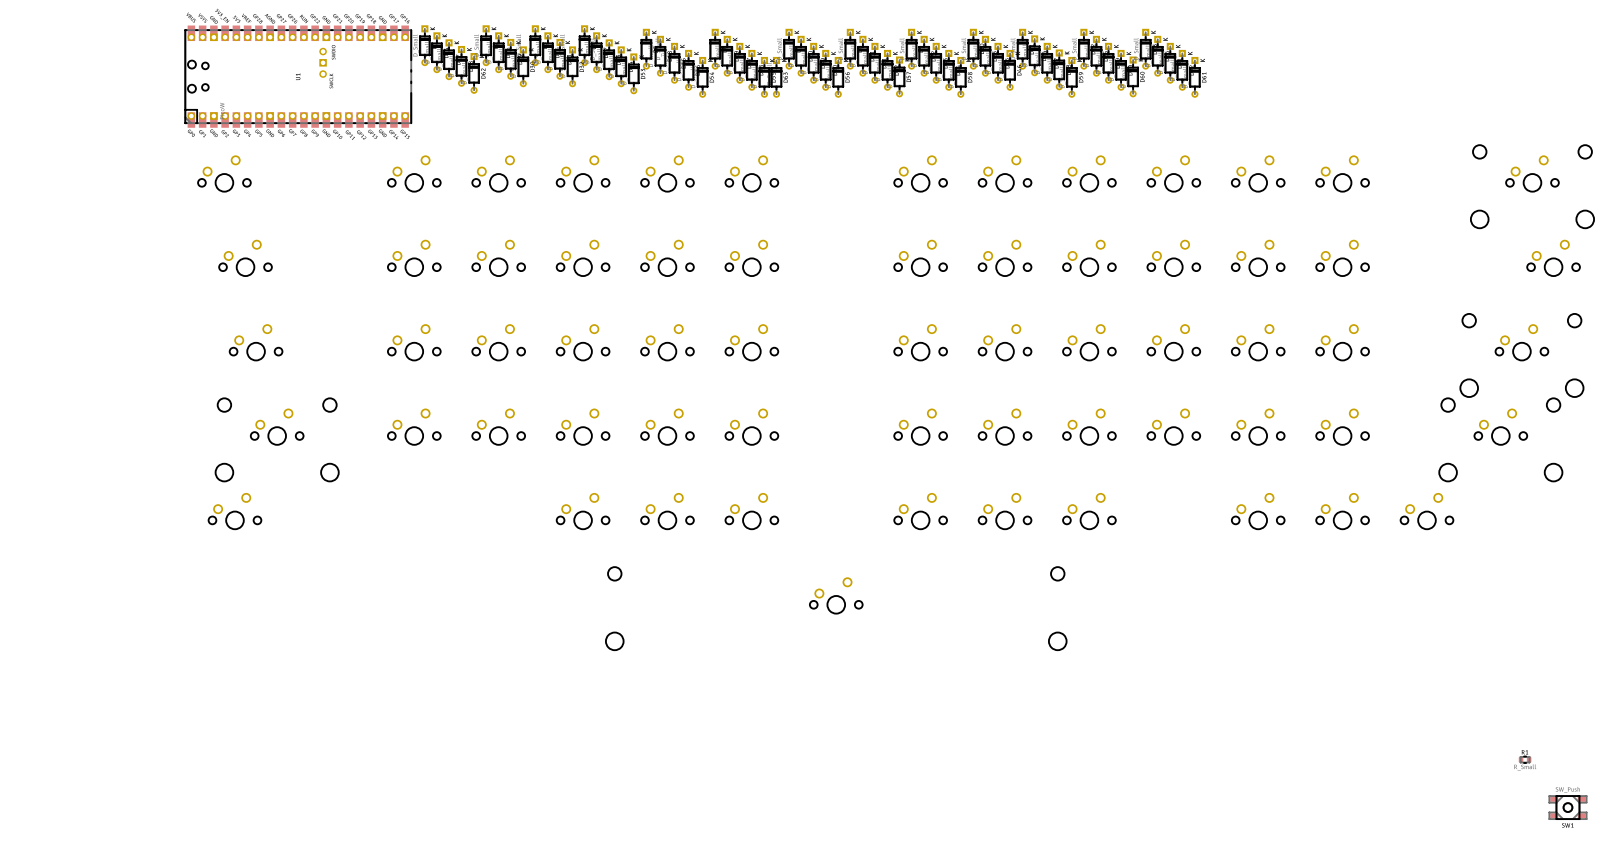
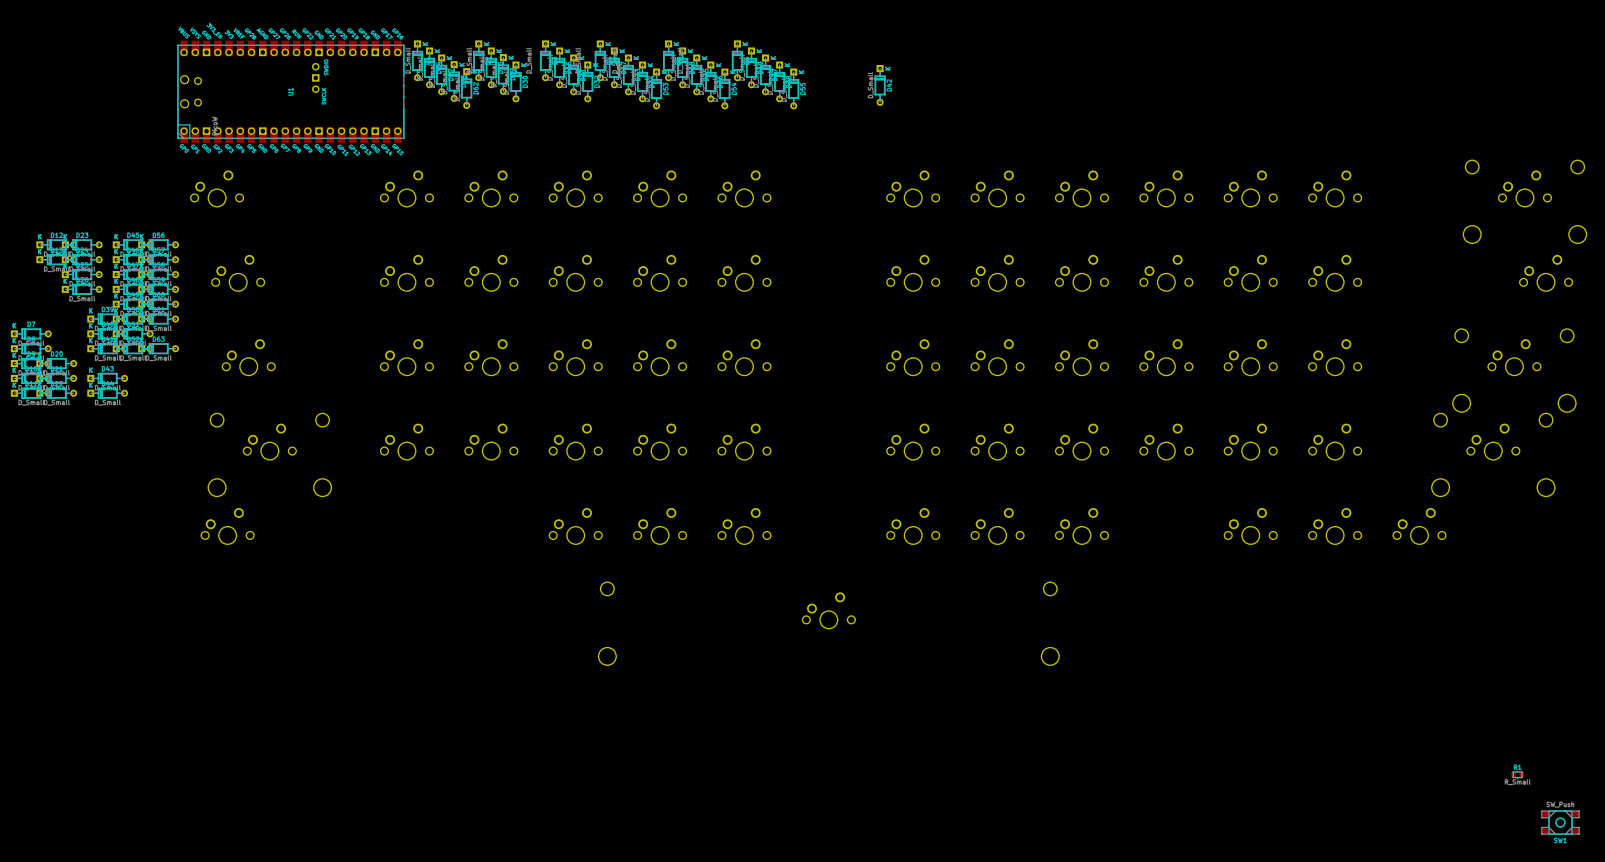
part footprint: [542, 32, 554, 74] -> [554, 47, 565, 89]
part footprint: [554, 38, 566, 80] -> [568, 54, 579, 96]
part position: (535, 45) -> (545, 60)
part position: (584, 45) -> (600, 60)
part footprint: [567, 46, 578, 88] -> [582, 61, 593, 103]
part position: (646, 49) -> (668, 60)
part position: (715, 49) -> (737, 60)
part rotation: 0° (789, 49) -> 90° counterclockwise (31, 333)
part position: (789, 49) -> (31, 333)
part rotation: 0° (850, 49) -> 90° counterclockwise (31, 348)
part position: (850, 49) -> (31, 348)
part rotation: 0° (911, 49) -> 90° counterclockwise (31, 363)
part position: (911, 49) -> (31, 363)
part rotation: 0° (973, 49) -> 90° counterclockwise (31, 378)
part position: (973, 49) -> (31, 378)
part rotation: 0° (1022, 49) -> 90° counterclockwise (31, 393)
part position: (1022, 49) -> (31, 393)
part rotation: 0° (1083, 49) -> 90° counterclockwise (56, 244)
part position: (1083, 49) -> (56, 244)
part rotation: 0° (1145, 49) -> 90° counterclockwise (56, 259)
part position: (1145, 49) -> (56, 259)
part position: (596, 52) -> (614, 67)
part rotation: 0° (1034, 55) -> 90° counterclockwise (82, 259)
part position: (1034, 55) -> (82, 259)
part position: (660, 56) -> (682, 67)
part position: (727, 56) -> (751, 67)
part rotation: 0° (801, 56) -> 90° counterclockwise (56, 363)
part position: (801, 56) -> (56, 363)
part rotation: 0° (862, 56) -> 90° counterclockwise (56, 378)
part position: (862, 56) -> (56, 378)
part rotation: 0° (924, 56) -> 90° counterclockwise (56, 393)
part position: (924, 56) -> (56, 393)
part rotation: 0° (985, 56) -> 90° counterclockwise (82, 244)
part position: (985, 56) -> (82, 244)
part rotation: 0° (1096, 56) -> 90° counterclockwise (82, 274)
part position: (1096, 56) -> (82, 274)
part rotation: 0° (1157, 56) -> 90° counterclockwise (82, 289)
part position: (1157, 56) -> (82, 289)
part position: (609, 59) -> (628, 74)
part position: (674, 63) -> (696, 74)
part position: (739, 63) -> (765, 74)
part rotation: 0° (813, 63) -> 90° counterclockwise (107, 319)
part position: (813, 63) -> (107, 319)
part rotation: 0° (874, 63) -> 90° counterclockwise (107, 348)
part position: (874, 63) -> (107, 348)
part rotation: 0° (936, 63) -> 90° counterclockwise (107, 378)
part position: (936, 63) -> (107, 378)
part rotation: 0° (998, 63) -> 90° counterclockwise (133, 244)
part position: (998, 63) -> (133, 244)
part rotation: 0° (1047, 63) -> 90° counterclockwise (133, 274)
part position: (1047, 63) -> (133, 274)
part rotation: 0° (1108, 63) -> 90° counterclockwise (133, 304)
part position: (1108, 63) -> (133, 304)
part rotation: 0° (1170, 63) -> 90° counterclockwise (133, 333)
part position: (1170, 63) -> (133, 333)
part position: (621, 66) -> (642, 81)
part rotation: 0° (1059, 69) -> 90° counterclockwise (133, 289)
part position: (1059, 69) -> (133, 289)
part position: (688, 70) -> (710, 81)
part position: (751, 70) -> (779, 81)
part rotation: 0° (825, 70) -> 90° counterclockwise (107, 333)
part position: (825, 70) -> (107, 333)
part rotation: 0° (948, 70) -> 90° counterclockwise (107, 393)
part position: (948, 70) -> (107, 393)
part rotation: 0° (1010, 70) -> 90° counterclockwise (133, 259)
part position: (1010, 70) -> (133, 259)
part rotation: 0° (1121, 70) -> 90° counterclockwise (133, 319)
part position: (1121, 70) -> (133, 319)
part rotation: 0° (1182, 70) -> 90° counterclockwise (133, 348)
part position: (1182, 70) -> (133, 348)
part position: (633, 73) -> (656, 88)
part rotation: 0° (899, 76) -> 90° counterclockwise (158, 259)
part position: (899, 76) -> (158, 259)
part rotation: 0° (1133, 76) -> 90° counterclockwise (158, 304)
part position: (1133, 76) -> (158, 304)
part position: (702, 77) -> (724, 88)
part position: (764, 77) -> (793, 88)
part rotation: 0° (776, 77) -> 90° counterclockwise (158, 348)
part position: (776, 77) -> (158, 348)
part rotation: 0° (838, 77) -> 90° counterclockwise (158, 244)
part position: (838, 77) -> (158, 244)
part rotation: 0° (960, 77) -> 90° counterclockwise (158, 274)
part position: (960, 77) -> (158, 274)
part rotation: 0° (1071, 77) -> 90° counterclockwise (158, 289)
part position: (1071, 77) -> (158, 289)
part rotation: 0° (1194, 77) -> 90° counterclockwise (158, 319)
part position: (1194, 77) -> (158, 319)

